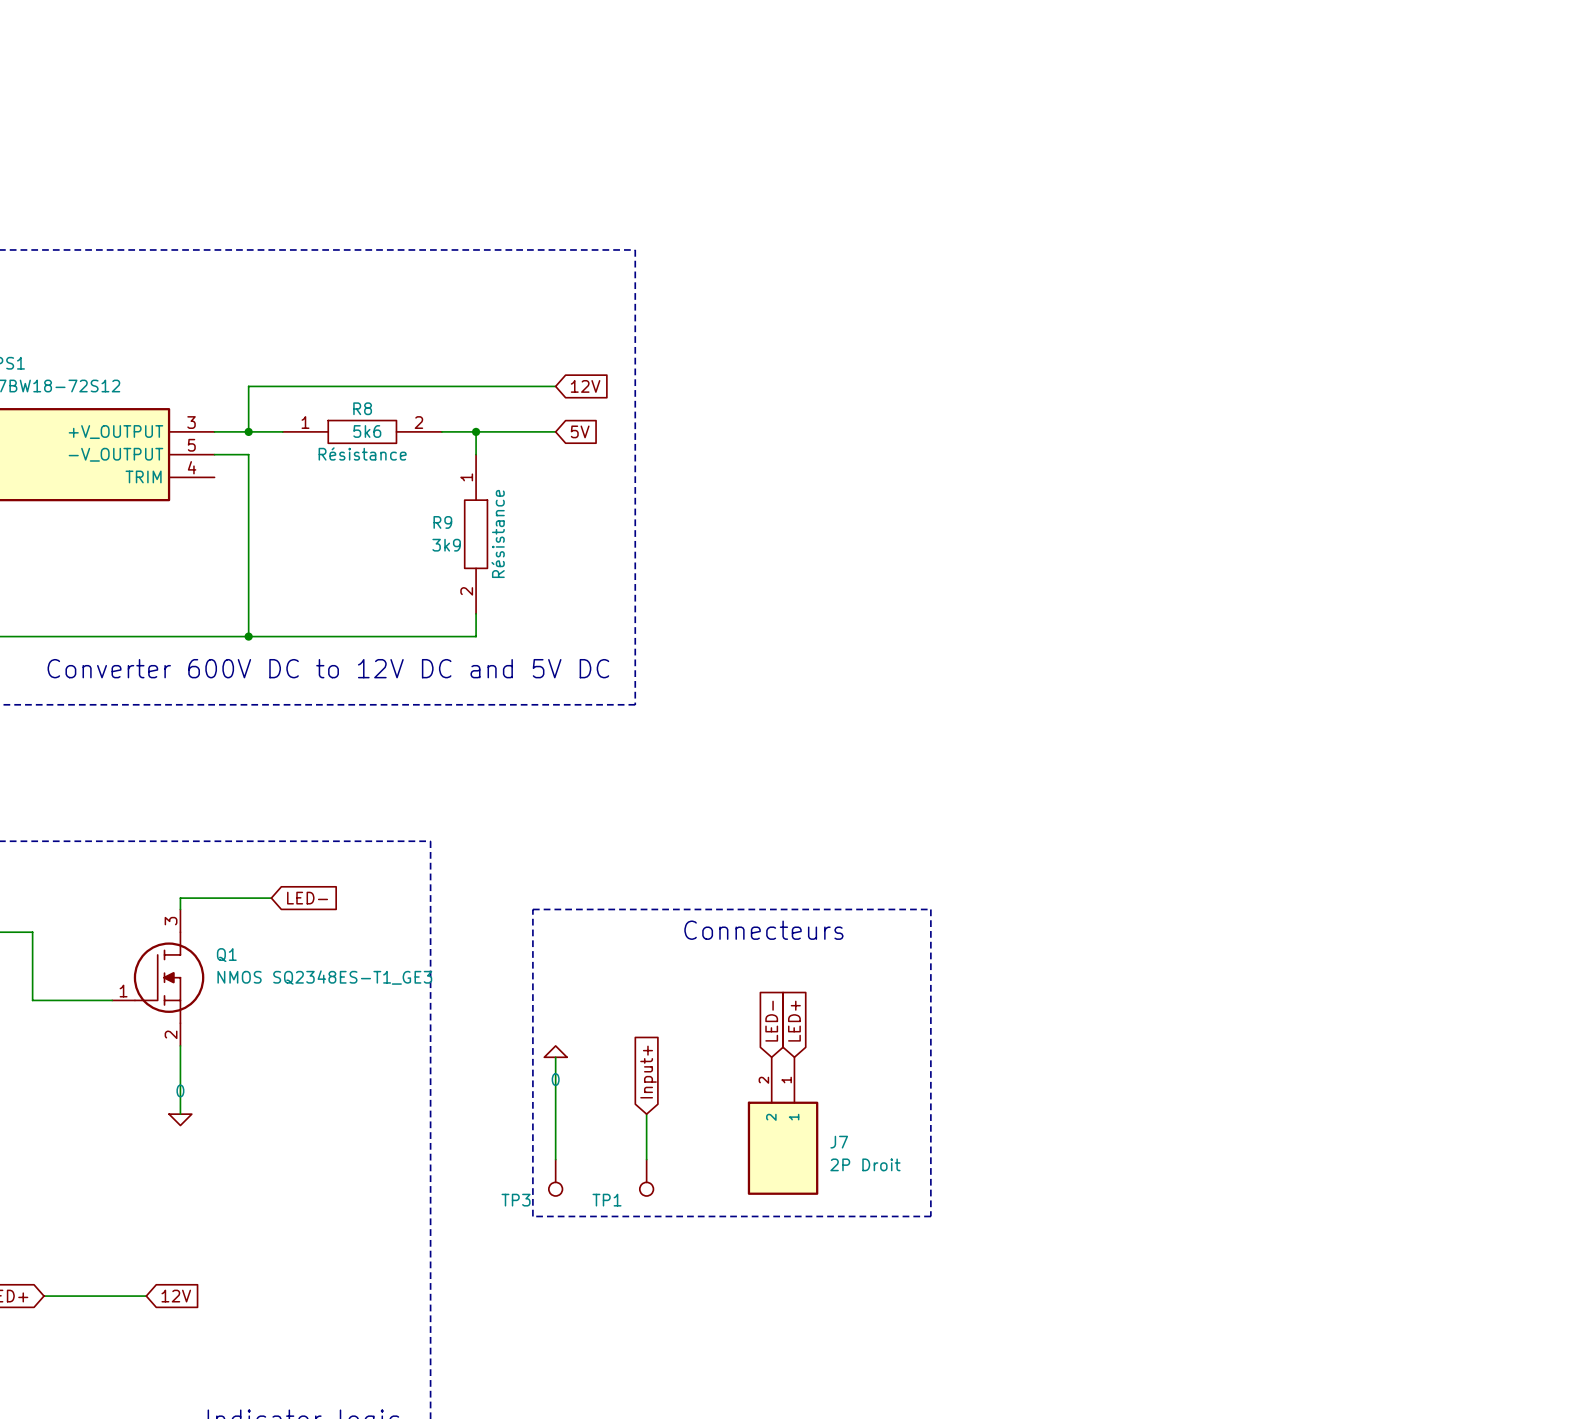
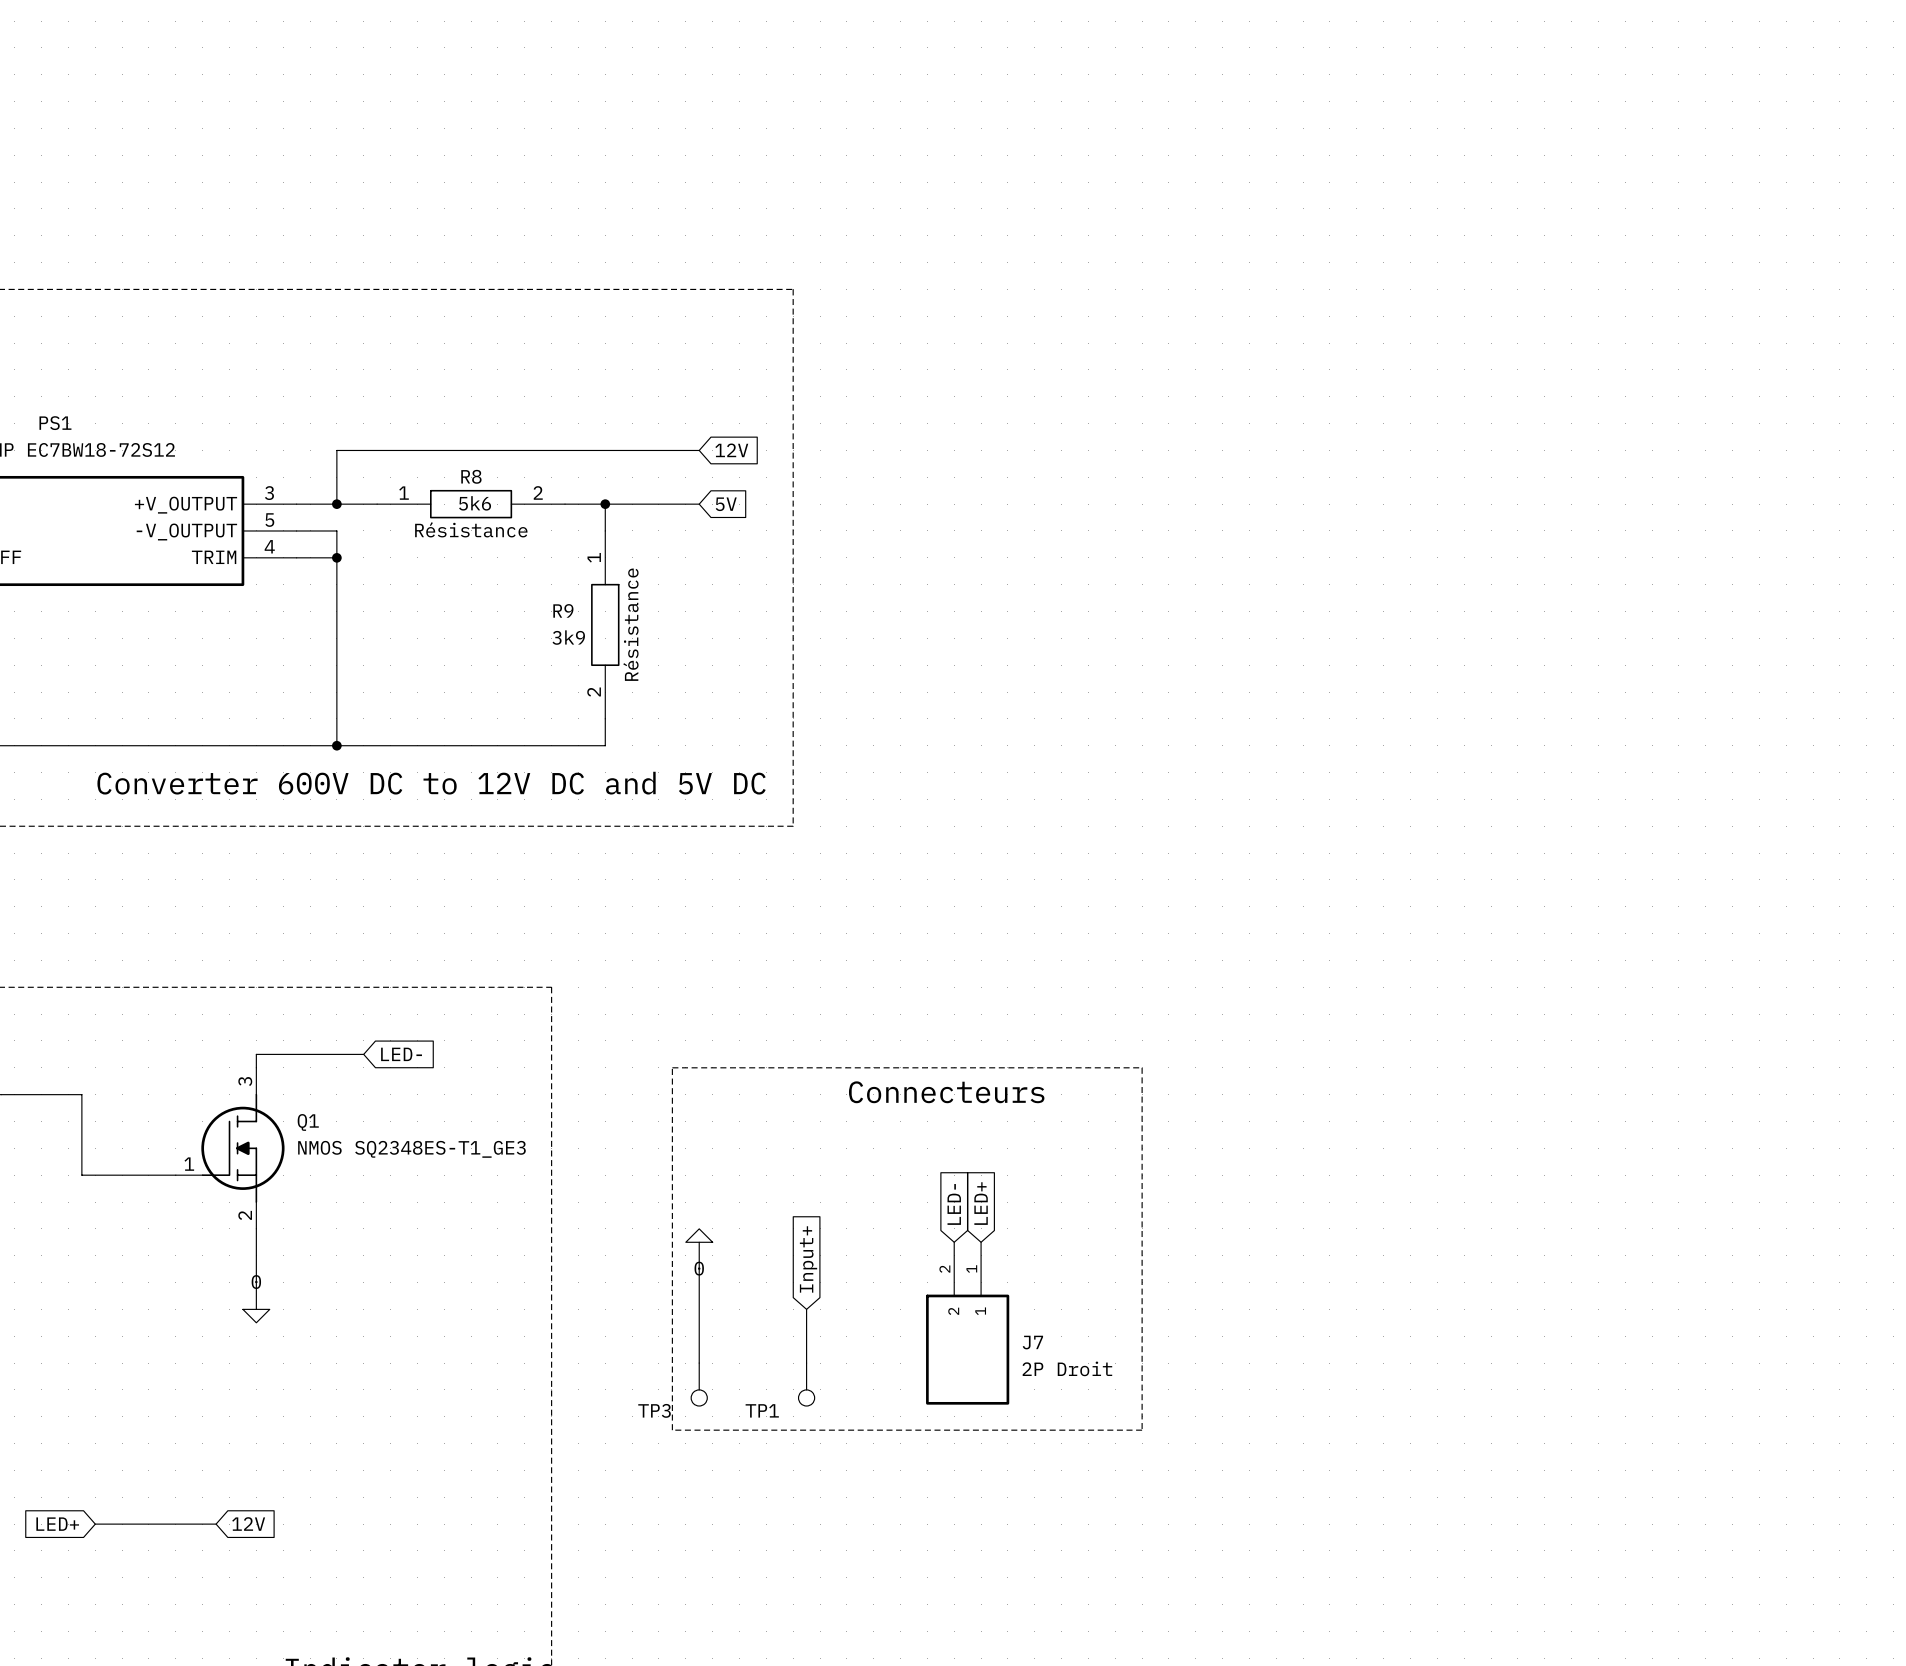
wire: none -> (296, 557) (336, 557)
junction: none -> (336, 557)

